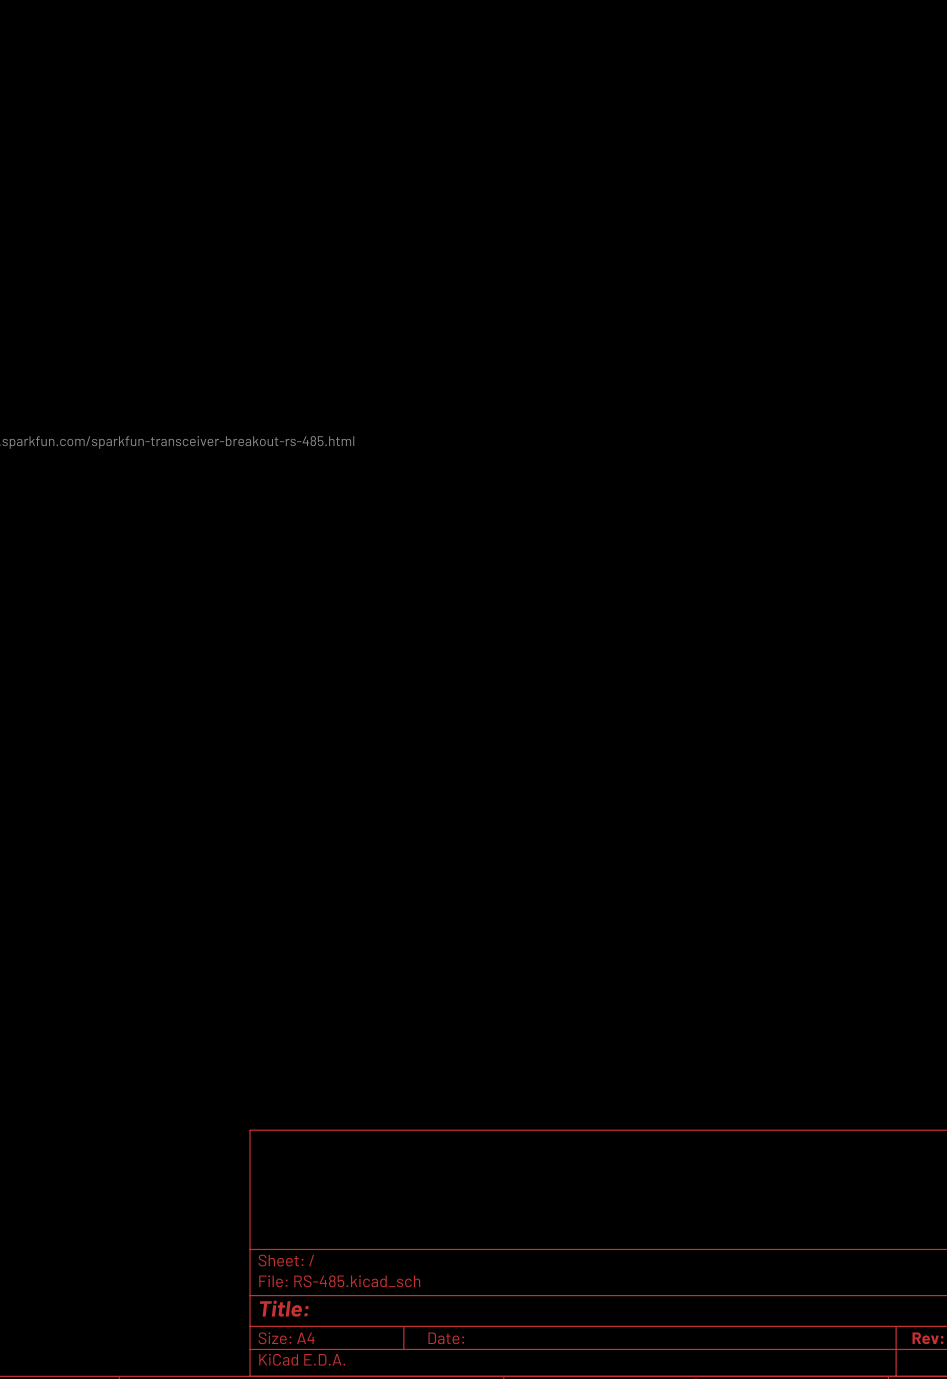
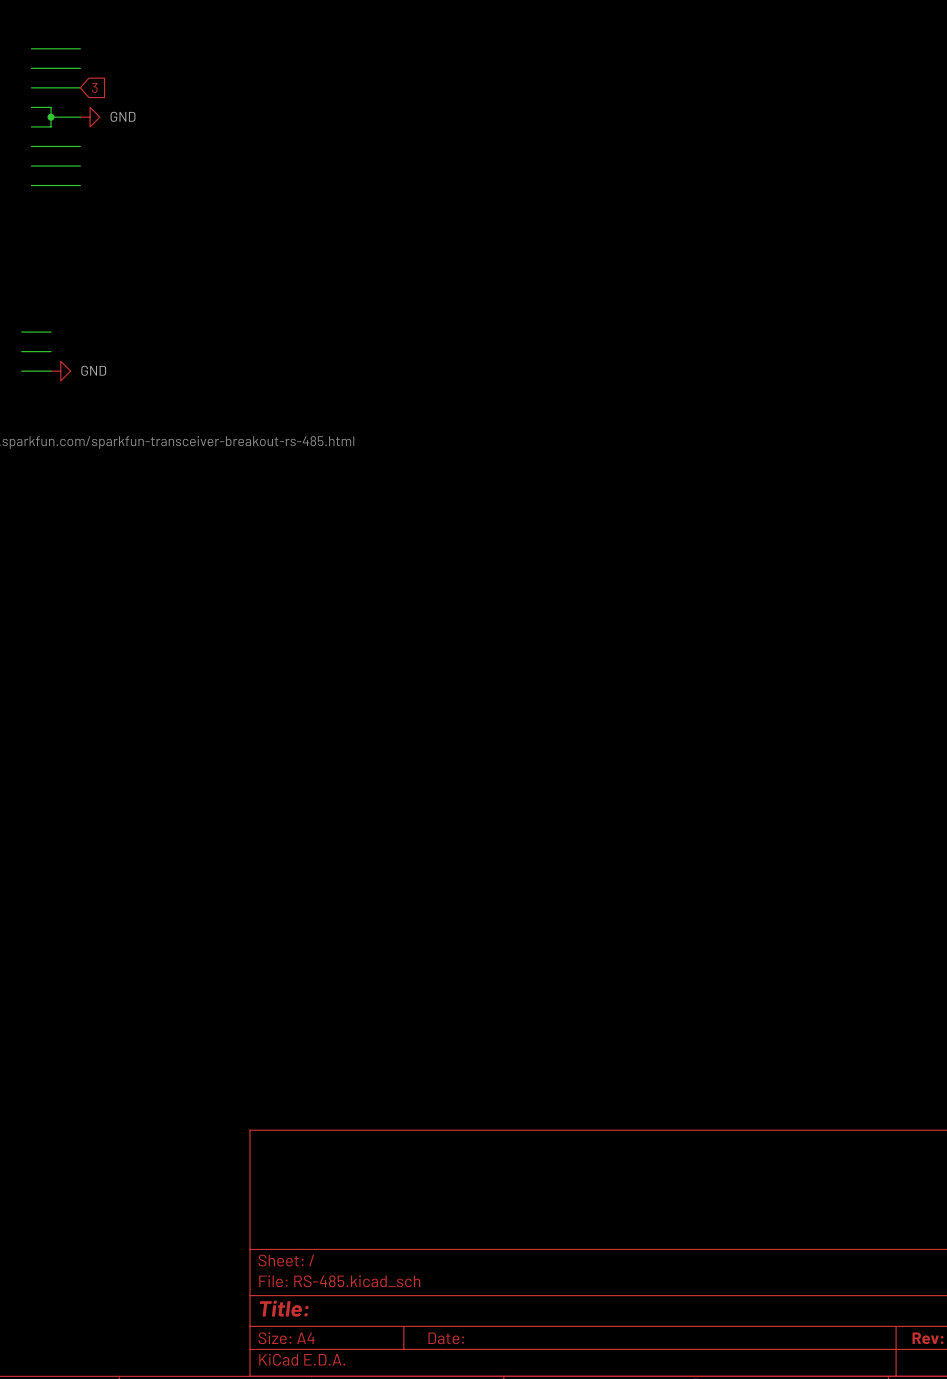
wire: none -> (31, 48) (80, 48)
wire: none -> (31, 68) (80, 68)
wire: none -> (31, 87) (80, 87)
global label: none -> 3 (94, 87)
wire: none -> (31, 107) (51, 107) (51, 126) (31, 126)
wire: none -> (51, 117) (80, 117)
junction: none -> (51, 117)
power symbol: none -> GND (90, 117)
wire: none -> (31, 146) (80, 146)
wire: none -> (31, 166) (80, 166)
wire: none -> (31, 185) (80, 185)
wire: none -> (21, 332) (51, 332)
wire: none -> (21, 351) (51, 351)
wire: none -> (21, 371) (51, 371)
power symbol: none -> GND (60, 371)

